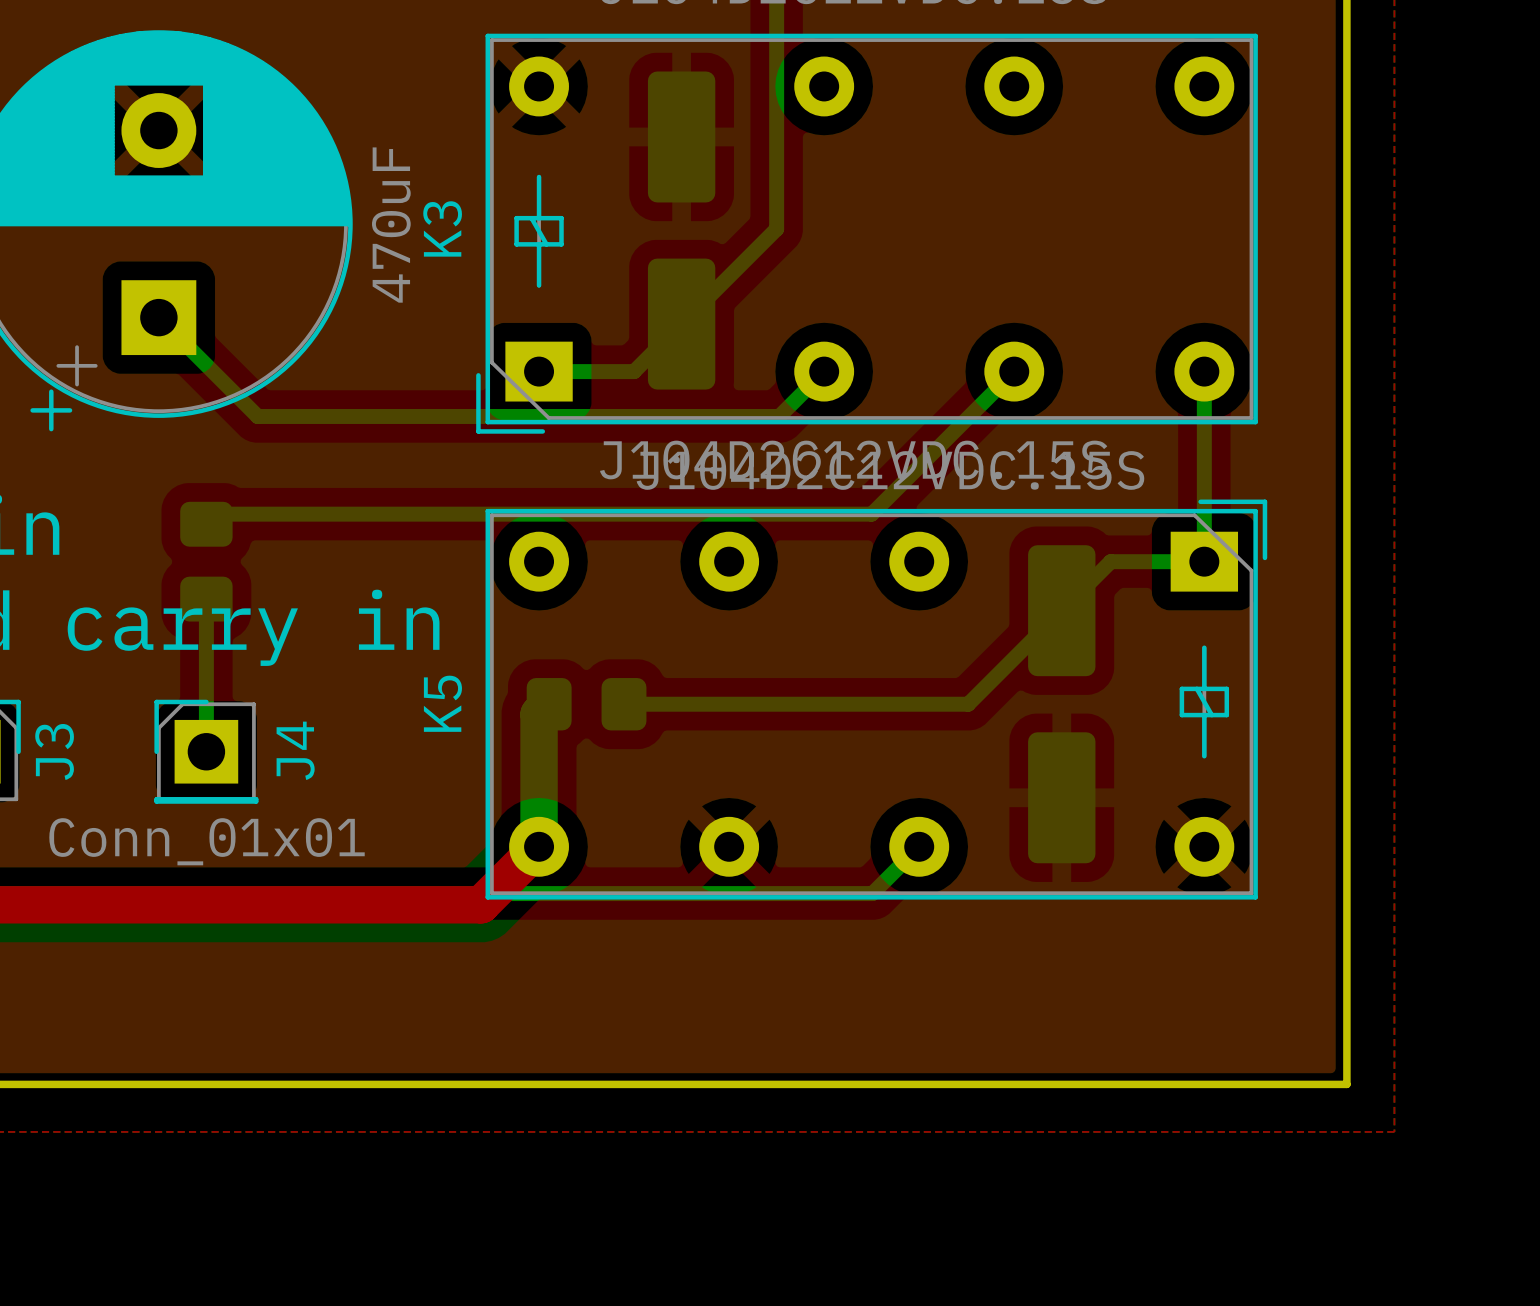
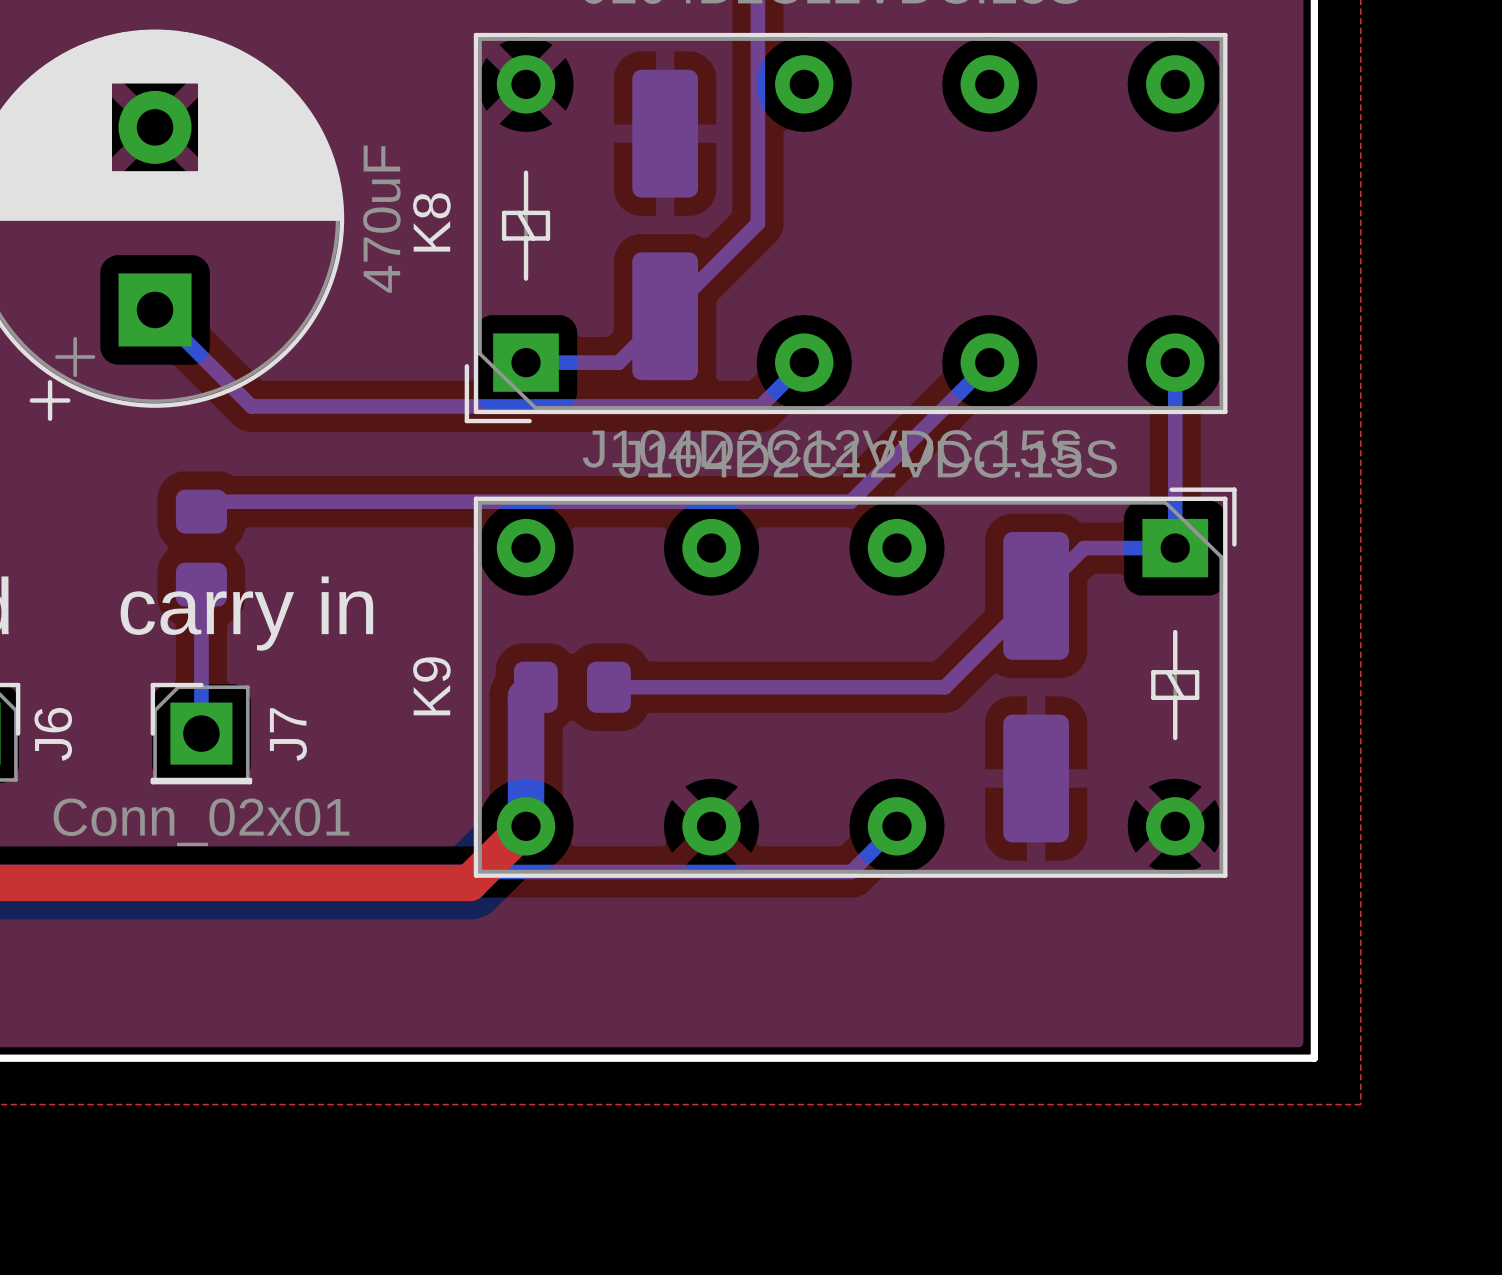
K3 name: K3 (442, 228) -> K8 (431, 222)
K5 name: K5 (442, 703) -> K9 (431, 686)
J4 name: J4 (295, 750) -> J7 (288, 734)
J3 name: J3 (54, 751) -> J6 (53, 734)
J4 value: Conn_01x01 (207, 841) -> Conn_02x01 (201, 822)

